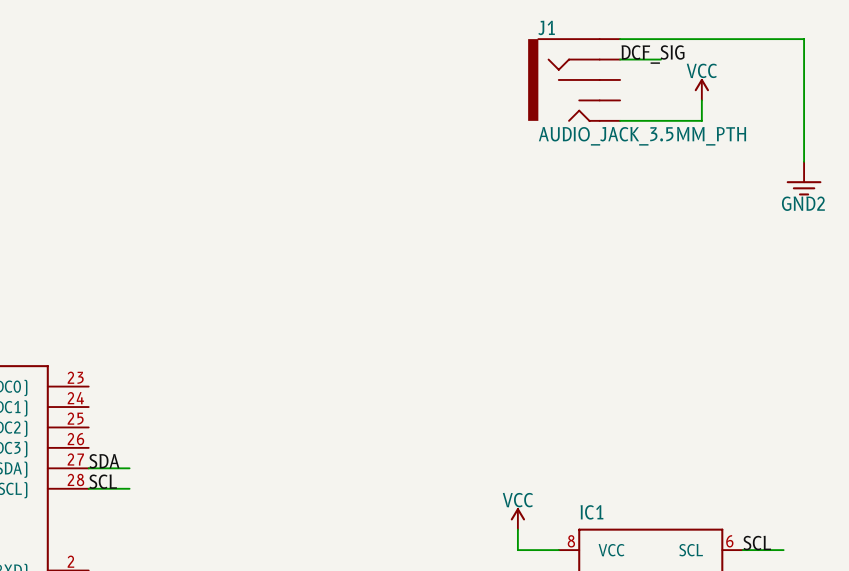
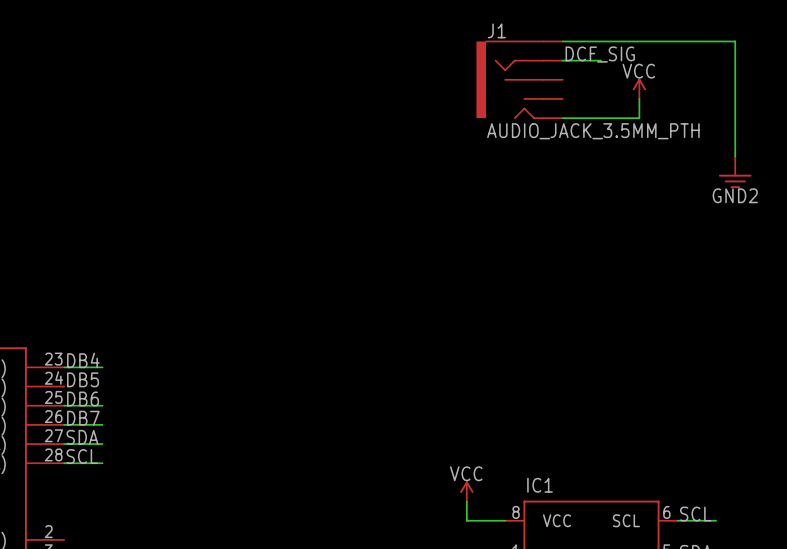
label: none -> DB4 (83, 360)
wire: none -> (64, 367) (102, 367)
label: none -> DB5 (83, 379)
label: none -> DB6 (83, 399)
wire: none -> (64, 405) (102, 405)
label: none -> DB7 (83, 418)
wire: none -> (64, 424) (102, 424)

